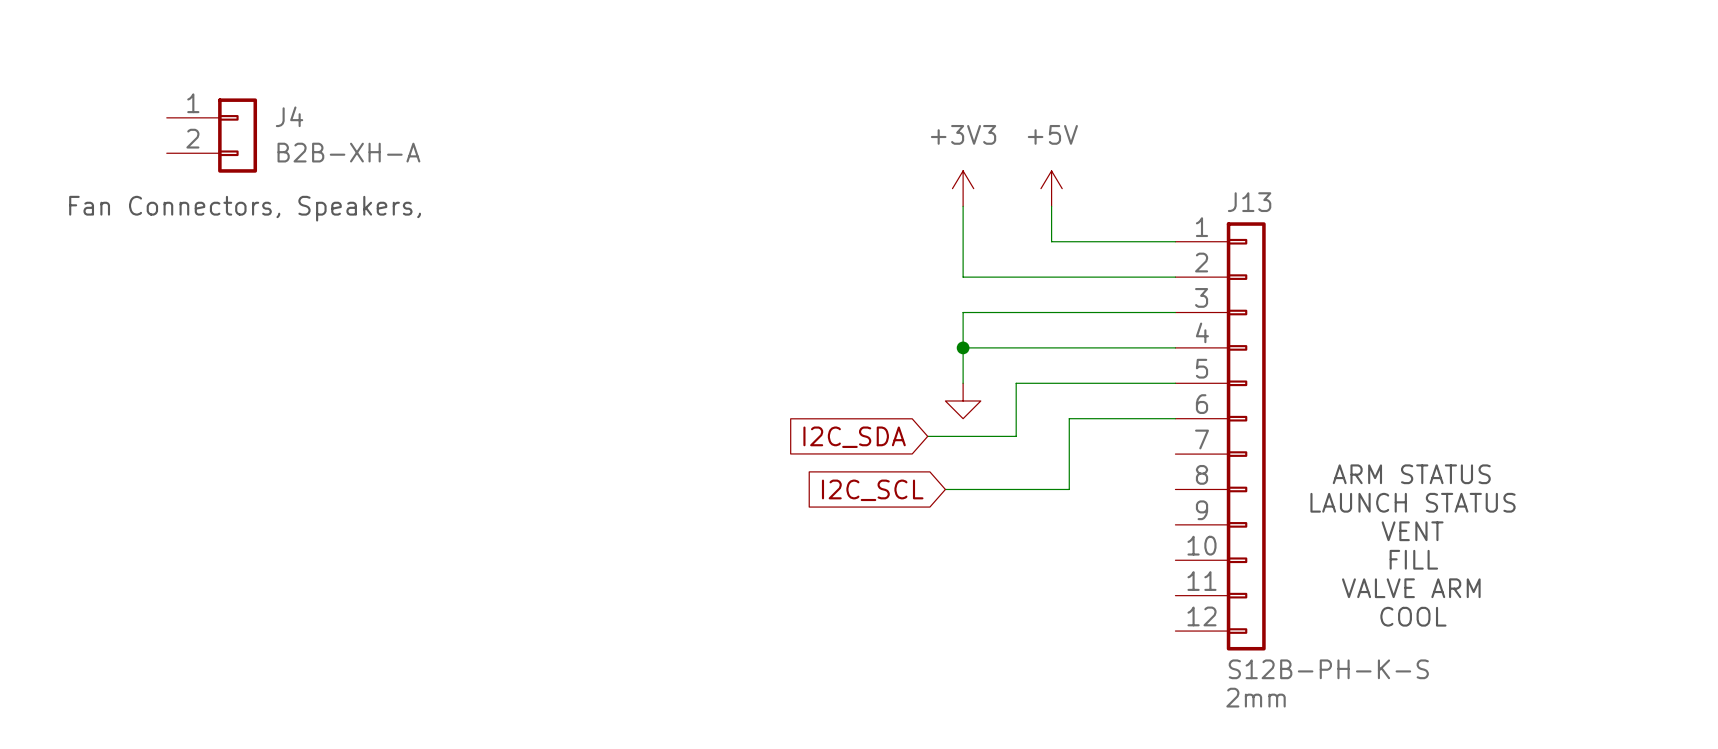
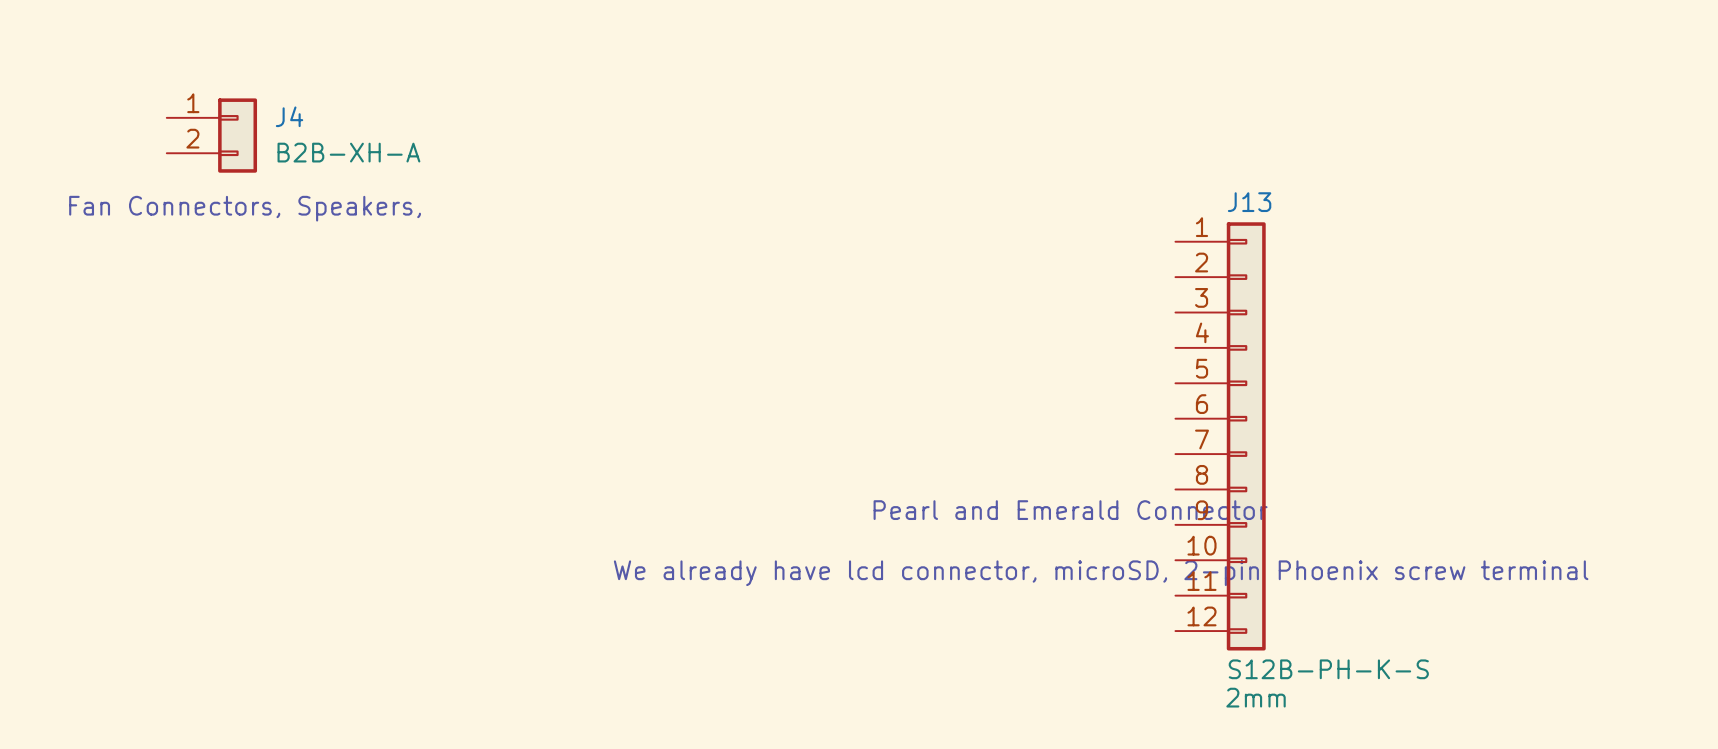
power symbol: +3V3 (963, 188) -> none
power symbol: +5V (1051, 188) -> none
wire: (963, 206) (963, 277) (1175, 277) -> none
wire: (1051, 206) (1051, 241) (1175, 241) -> none
wire: (1175, 312) (963, 312) (963, 383) -> none
wire: (963, 347) (1175, 347) -> none
junction: (963, 347) -> none
wire: (1175, 383) (1016, 383) (1016, 436) (927, 436) -> none
power symbol: (963, 400) -> none
wire: (1175, 418) (1069, 418) (1069, 489) (945, 489) -> none
global label: I2C_SDA (854, 437) -> none
text: ARM STATUS (1411, 474) -> none
global label: I2C_SCL (872, 490) -> none
text: LAUNCH STATUS (1413, 502) -> none
text: none -> Pearl and Emerald Connector (1070, 510)
text: VENT (1412, 531) -> none
text: FILL (1413, 559) -> none
text: none -> We already have lcd connector, microSD, 2-pin Phoenix screw terminal (1101, 573)
text: VALVE ARM (1411, 588) -> none
text: COOL (1413, 616) -> none

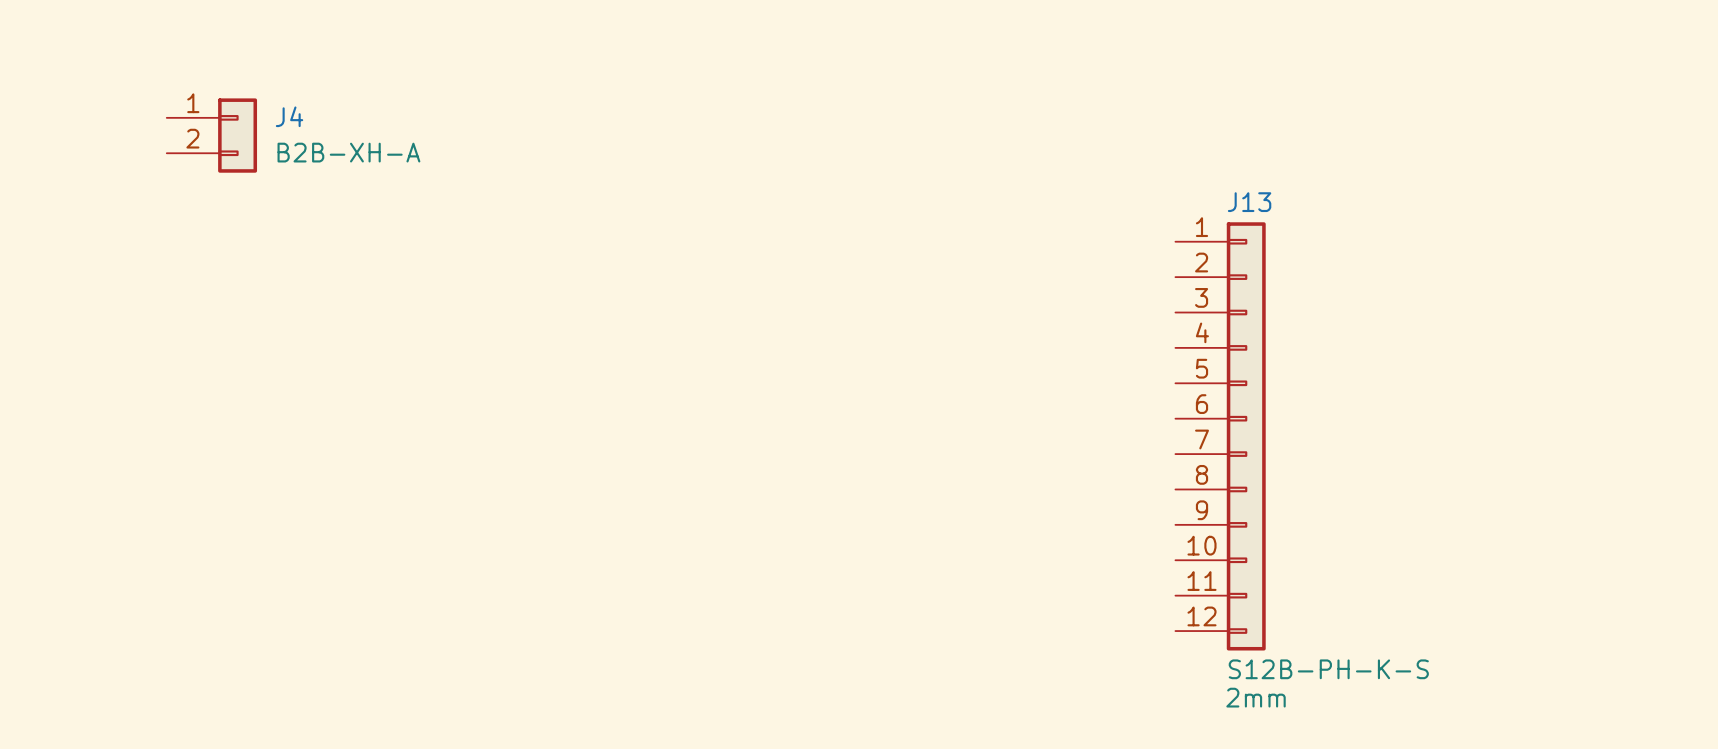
text: Fan Connectors, Speakers, (245, 208) -> none
text: Pearl and Emerald Connector (1070, 510) -> none
text: We already have lcd connector, microSD, 2-pin Phoenix screw terminal (1101, 573) -> none

